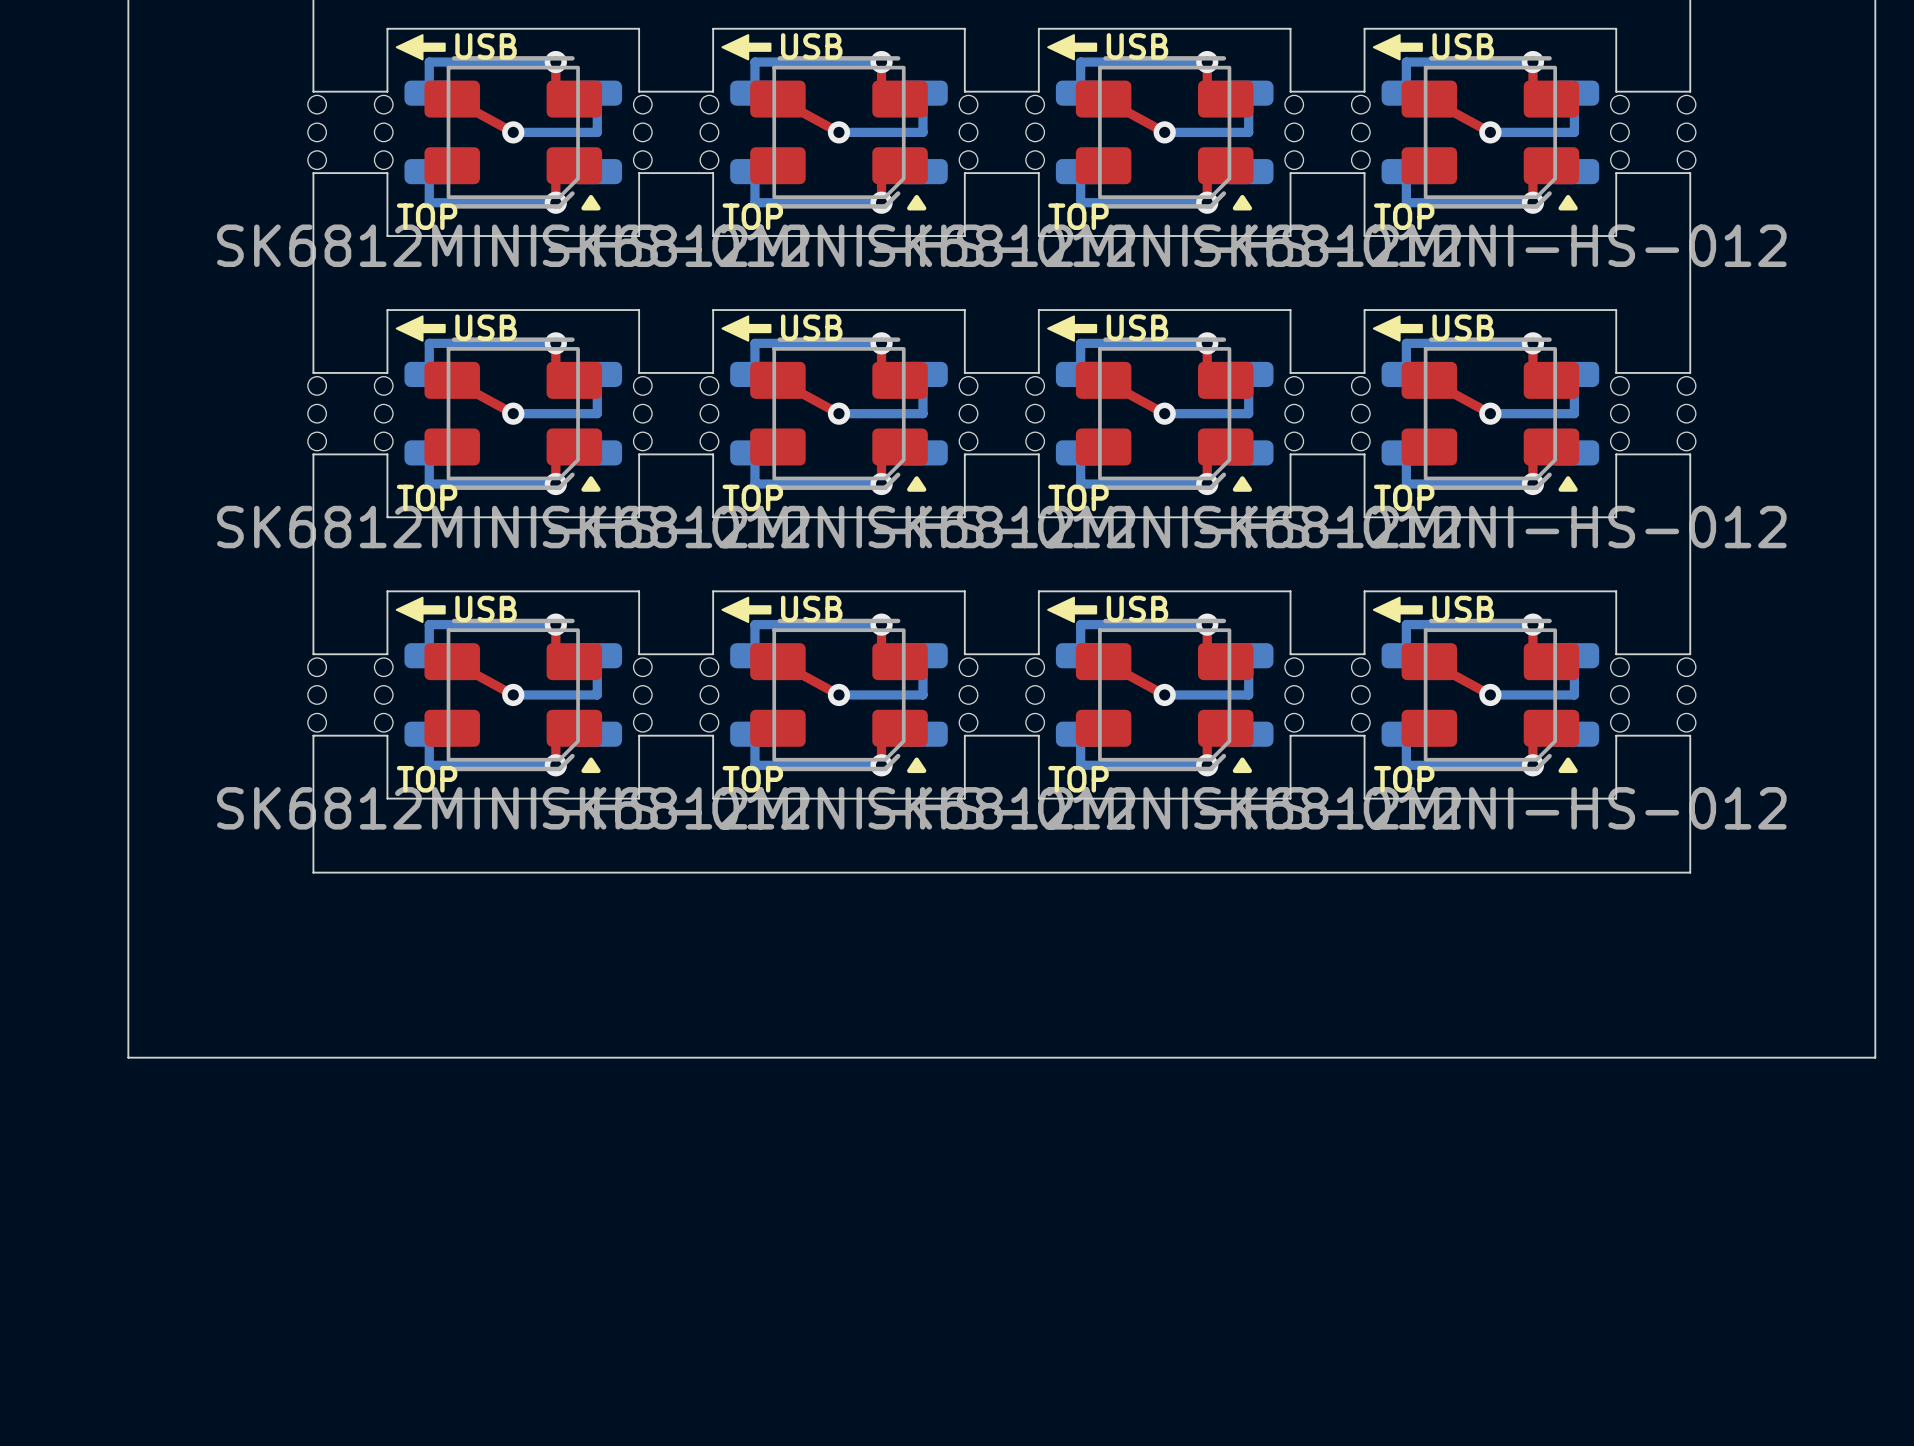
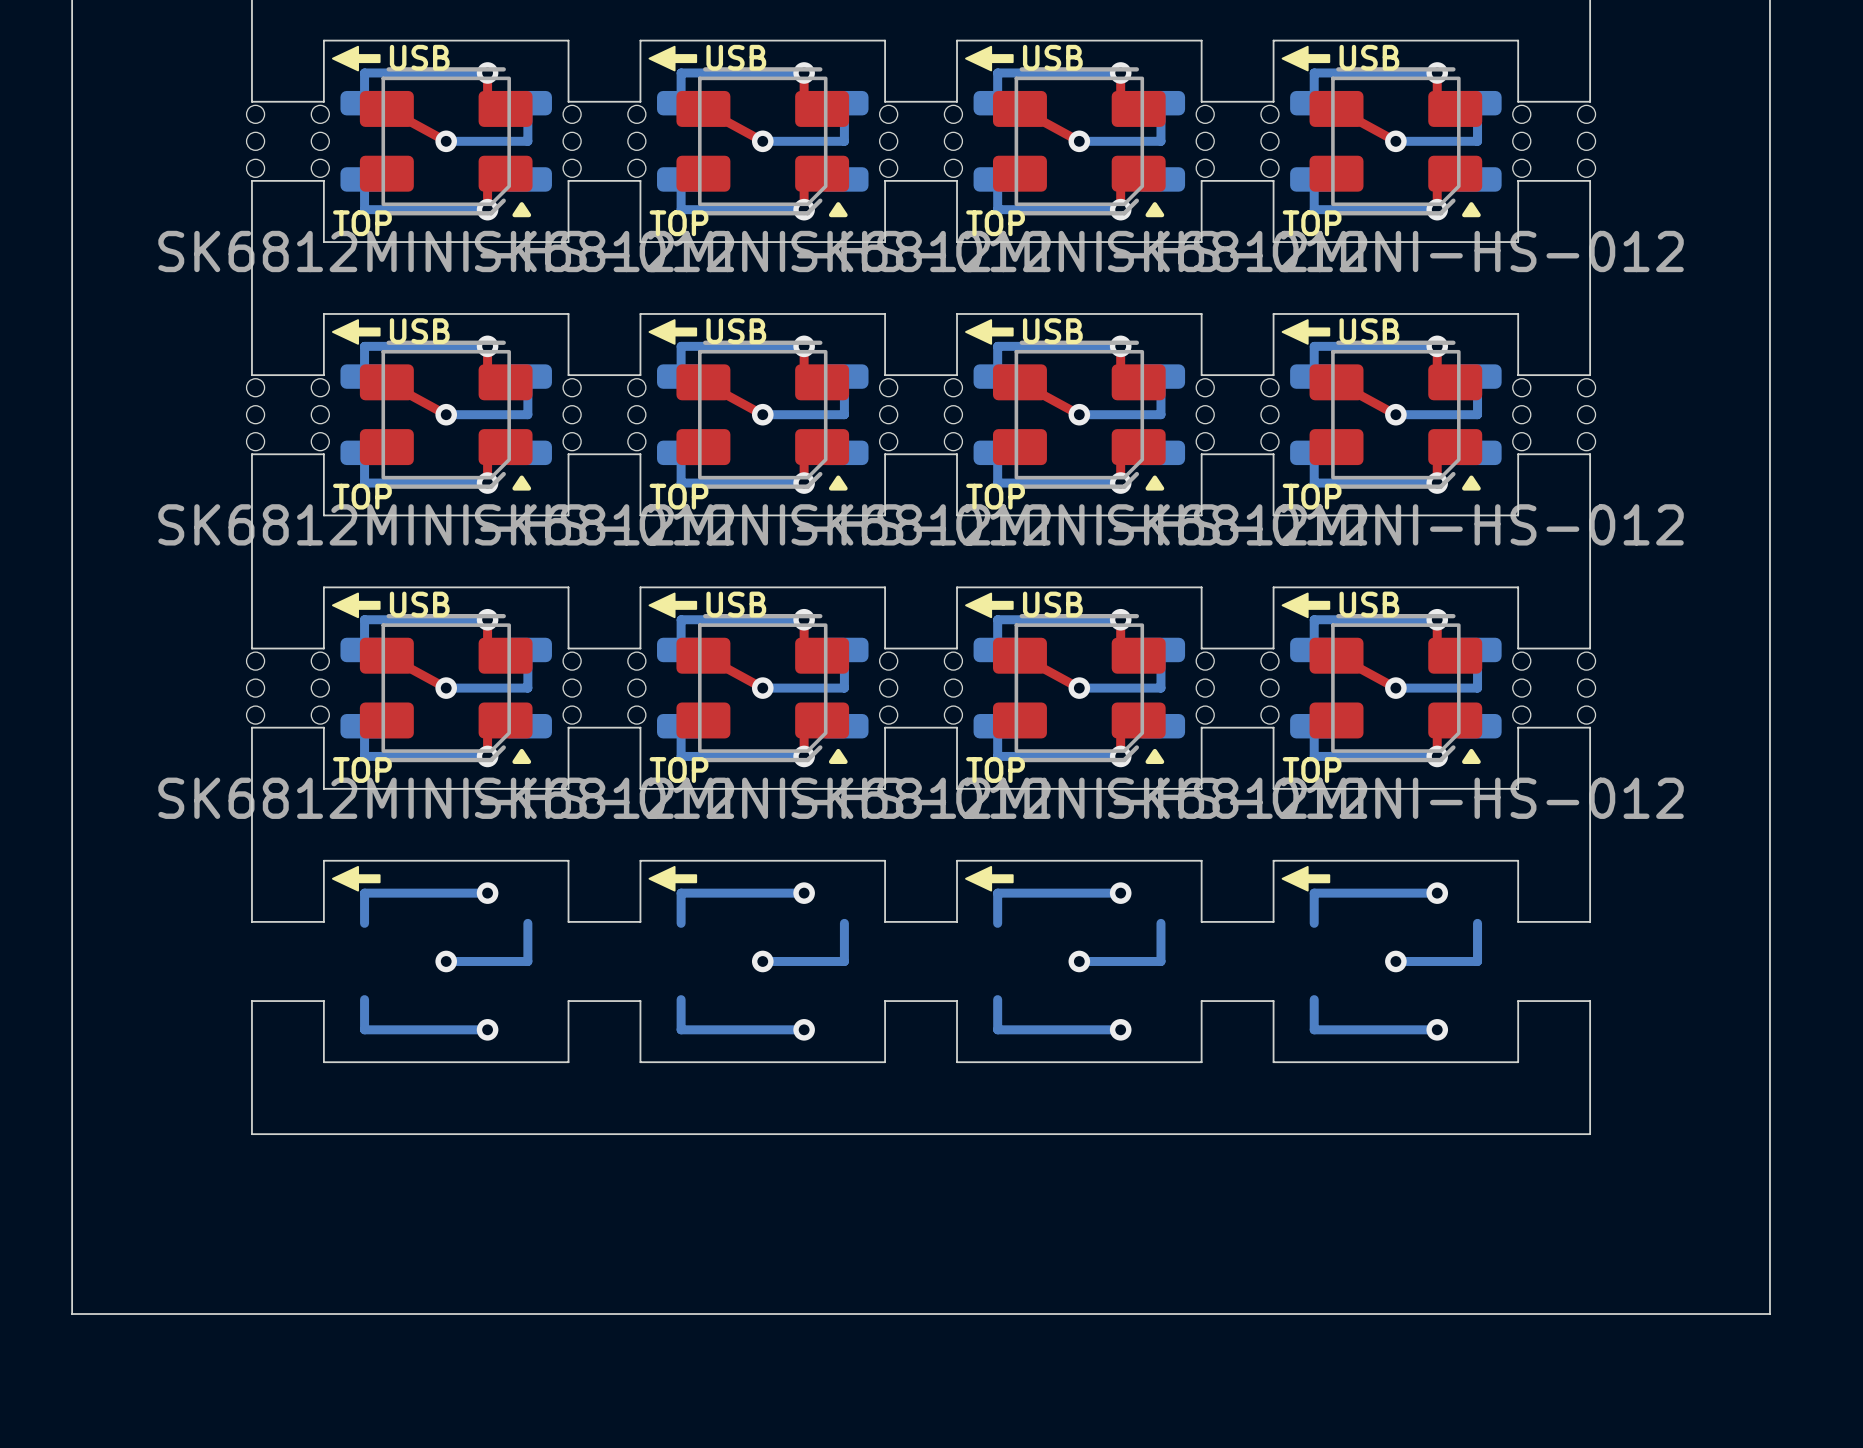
board edge: (313, 872) (387, 872) -> (251, 860) (251, 921) (323, 921) (323, 860)
board edge: (639, 872) (713, 872) -> (568, 860) (568, 921) (640, 921) (640, 860)
board edge: (964, 872) (1038, 872) -> (885, 860) (885, 921) (957, 921) (957, 860)
board edge: (1290, 872) (1364, 872) -> (1201, 860) (1201, 921) (1273, 921) (1273, 860)
board edge: (1616, 872) (1690, 872) -> (1518, 860) (1518, 921) (1590, 921) (1590, 860)
drawing: none -> [332, 865, 381, 892]
drawing: none -> [648, 865, 698, 892]
drawing: none -> [965, 865, 1014, 892]
drawing: none -> [1281, 865, 1331, 892]
bottom track: none -> (487, 893) (364, 893) (364, 923)
via: none -> (487, 893)
bottom track: none -> (804, 893) (681, 893) (681, 923)
via: none -> (804, 893)
bottom track: none -> (1120, 893) (997, 893) (997, 923)
via: none -> (1120, 893)
bottom track: none -> (1437, 893) (1314, 893) (1314, 923)
via: none -> (1437, 893)
bottom track: none -> (527, 923) (527, 961) (446, 961)
bottom track: none -> (844, 923) (844, 961) (762, 961)
bottom track: none -> (1160, 923) (1160, 961) (1079, 961)
bottom track: none -> (1477, 923) (1477, 961) (1395, 961)
via: none -> (446, 961)
via: none -> (762, 961)
via: none -> (1079, 961)
via: none -> (1395, 961)
bottom track: none -> (364, 999) (364, 1029) (487, 1029)
bottom track: none -> (681, 999) (681, 1029) (804, 1029)
bottom track: none -> (997, 999) (997, 1029) (1120, 1029)
bottom track: none -> (1314, 999) (1314, 1029) (1437, 1029)
board edge: none -> (251, 1001) (323, 1001) (323, 1062) (568, 1062) (568, 1001) (640, 1001) (640, 1062) (885, 1062) (885, 1001) (957, 1001) (957, 1062) (1201, 1062) (1201, 1001) (1273, 1001) (1273, 1062) (1518, 1062) (1518, 1001) (1590, 1001) (1590, 1134) (251, 1134) (251, 1001)
via: none -> (487, 1029)
via: none -> (804, 1029)
via: none -> (1120, 1029)
via: none -> (1437, 1029)
board edge: (128, 1057) (1875, 1057) -> (72, 1040) (72, 1314) (1769, 1314) (1769, 1040)

